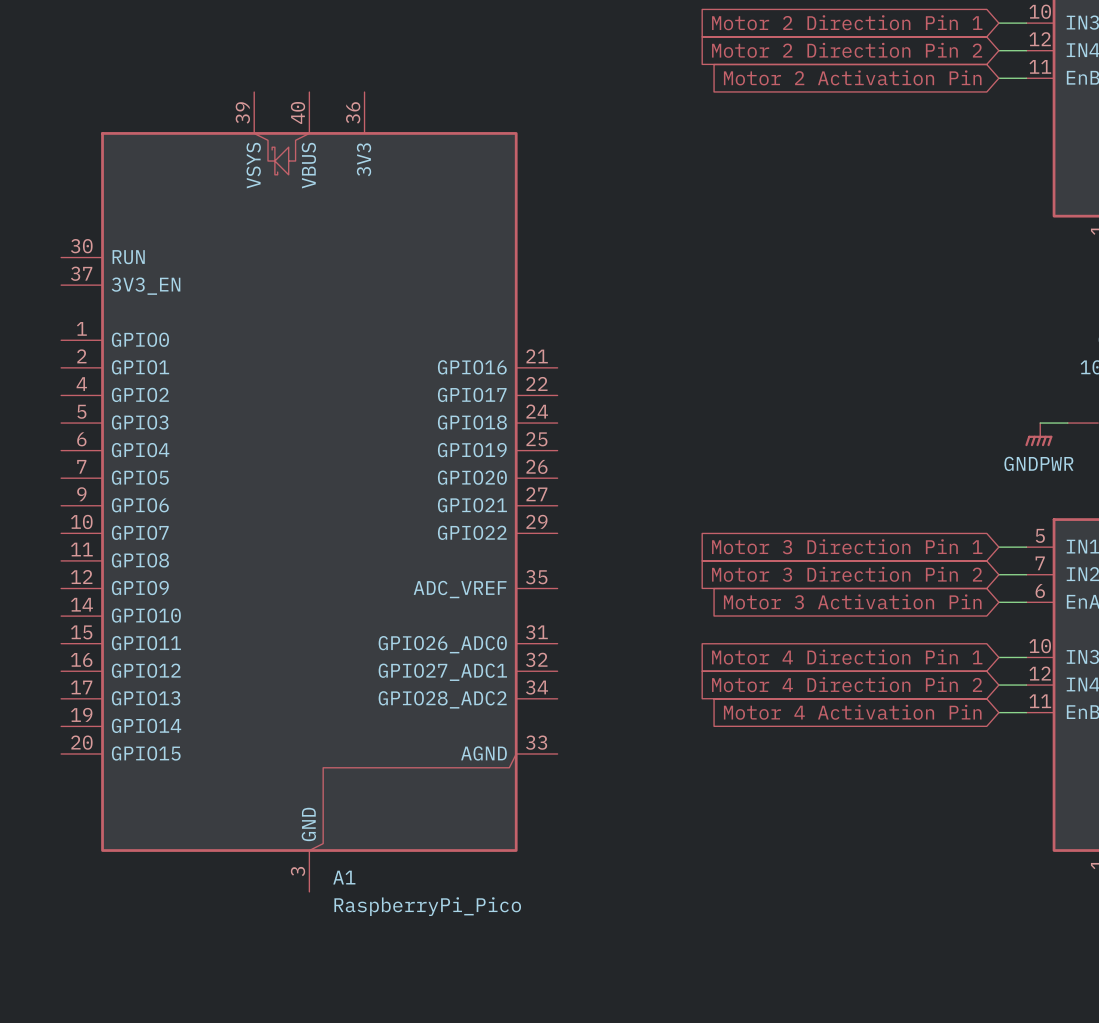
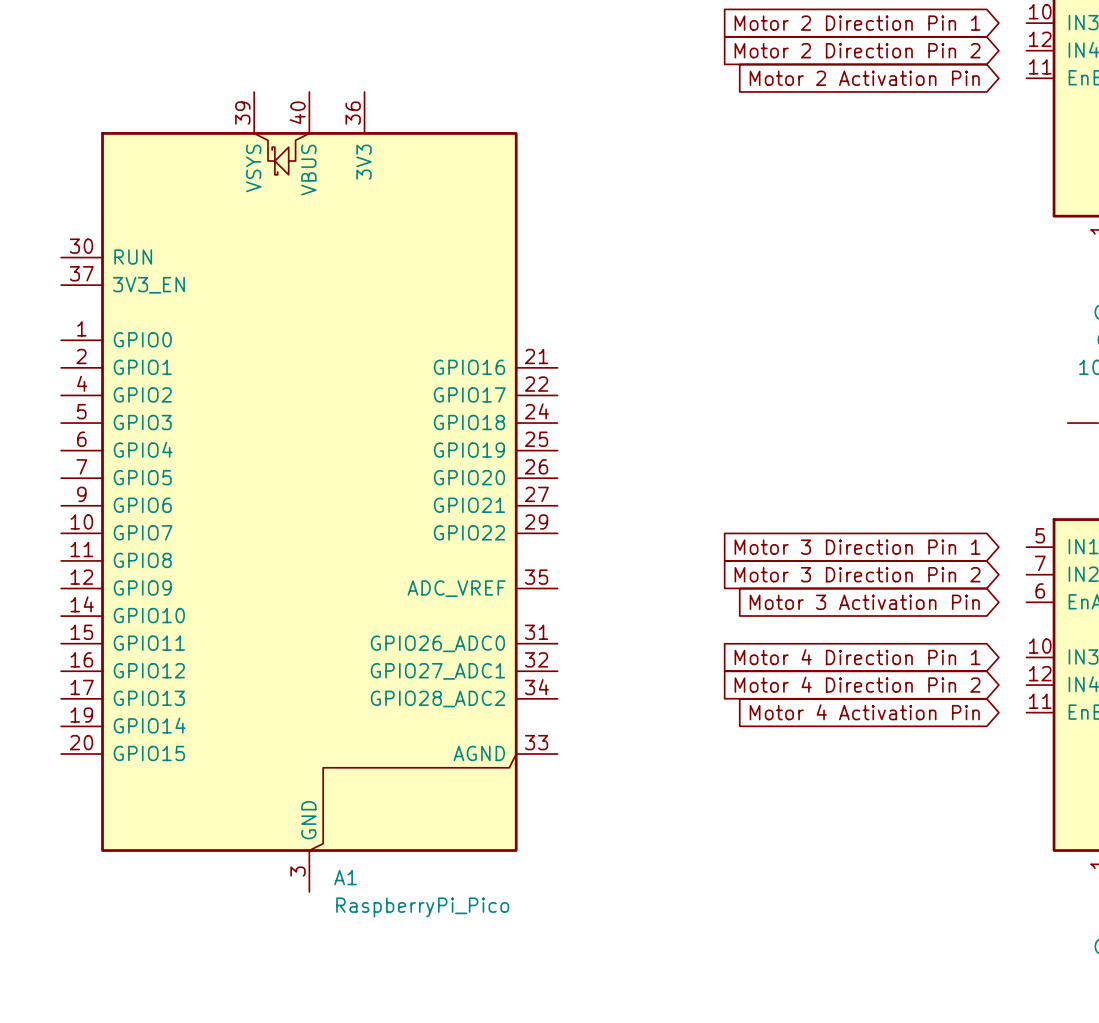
wire: (998, 23) (1026, 23) -> none
wire: (998, 50) (1026, 50) -> none
wire: (998, 78) (1026, 78) -> none
wire: (1040, 423) (1067, 423) -> none
power symbol: GNDPWR (1038, 434) -> none
wire: (998, 547) (1026, 547) -> none
wire: (998, 574) (1026, 574) -> none
wire: (998, 602) (1026, 602) -> none
wire: (998, 657) (1026, 657) -> none
wire: (998, 685) (1026, 685) -> none
wire: (998, 712) (1026, 712) -> none

